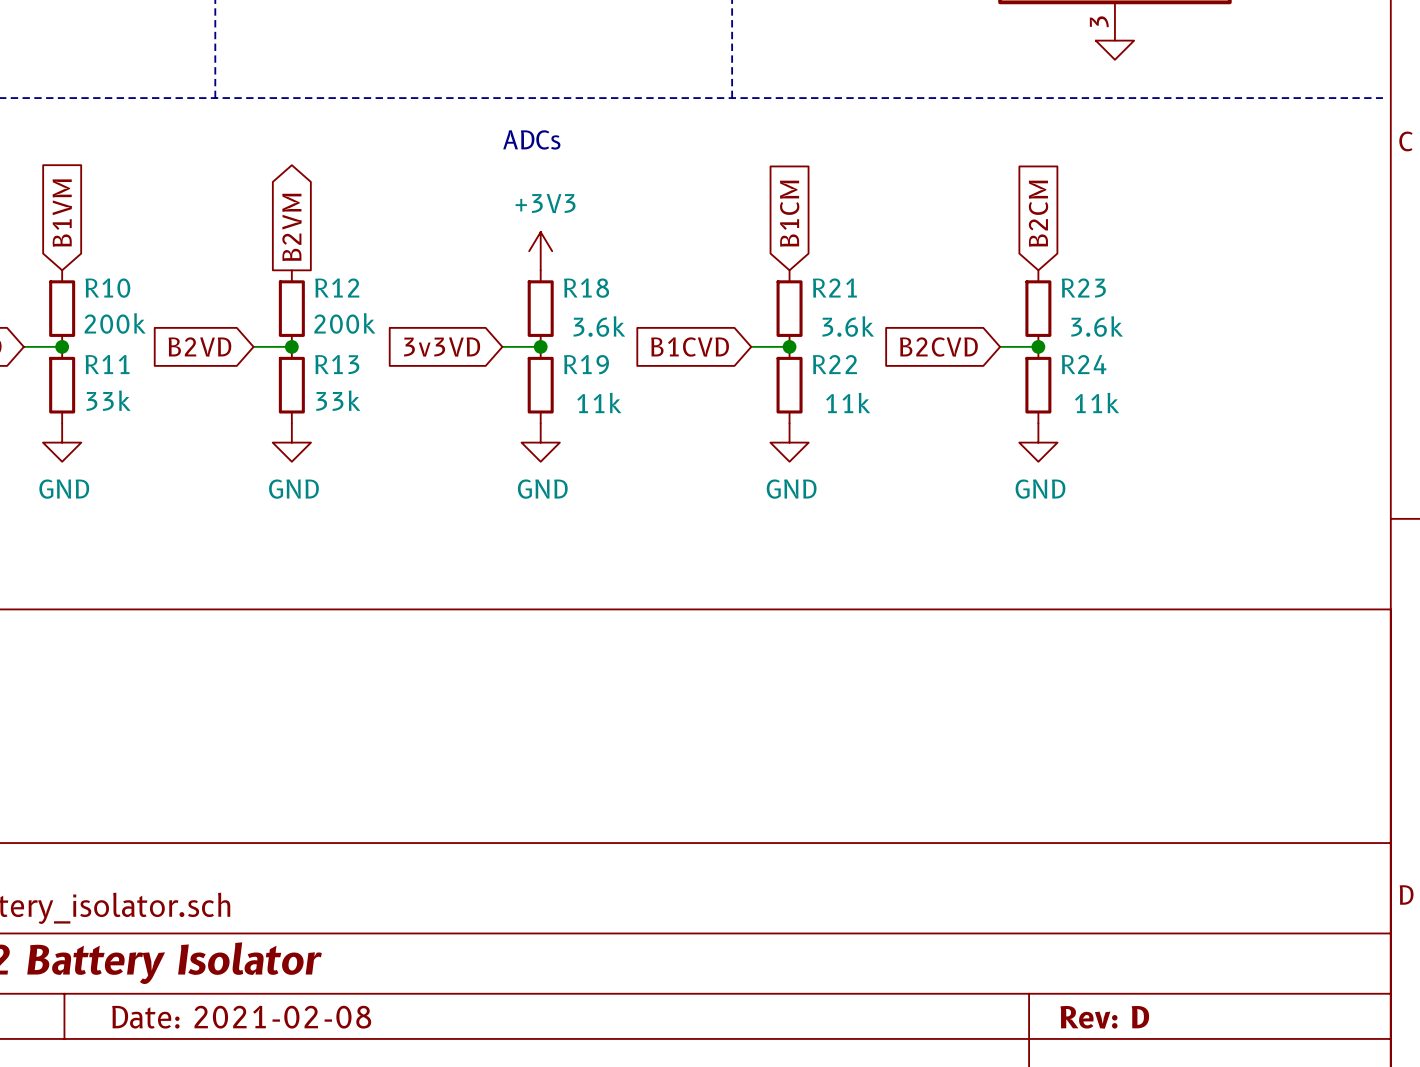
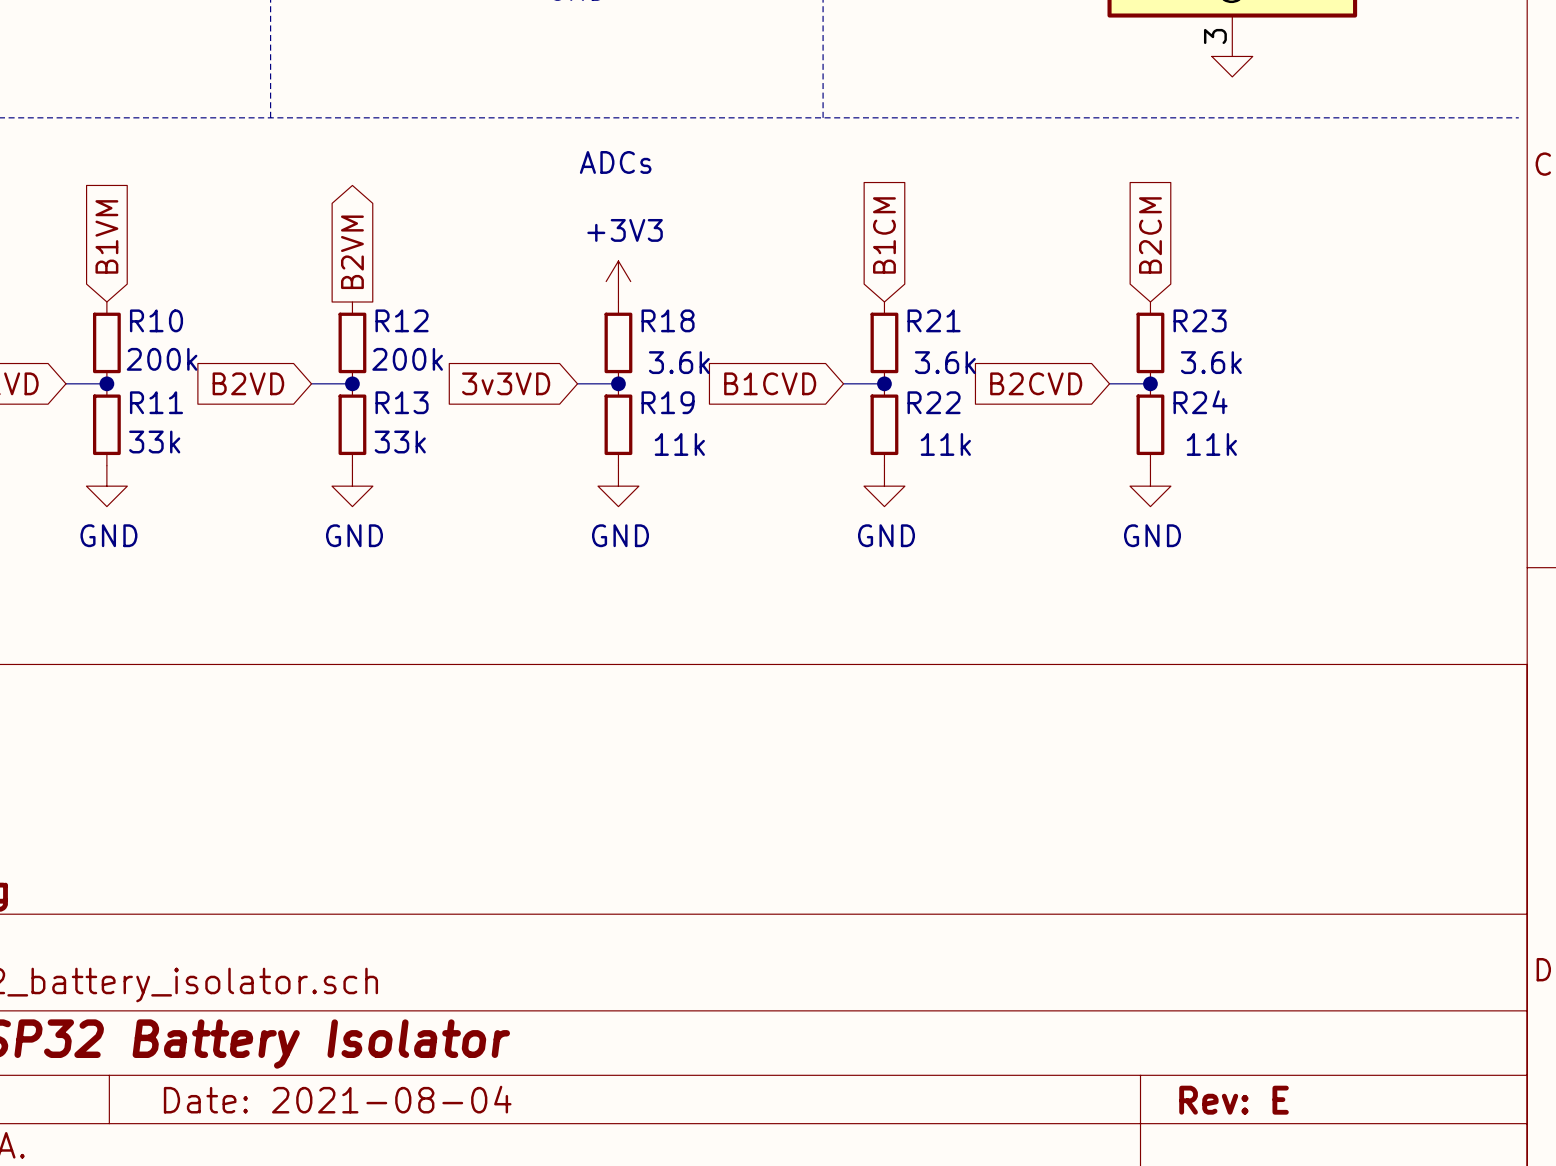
title block: Date: 2021-02-08 (241, 1017) -> Date: 2021-08-04 (337, 1099)
title block: Rev: D (1104, 1017) -> Rev: E (1234, 1100)

